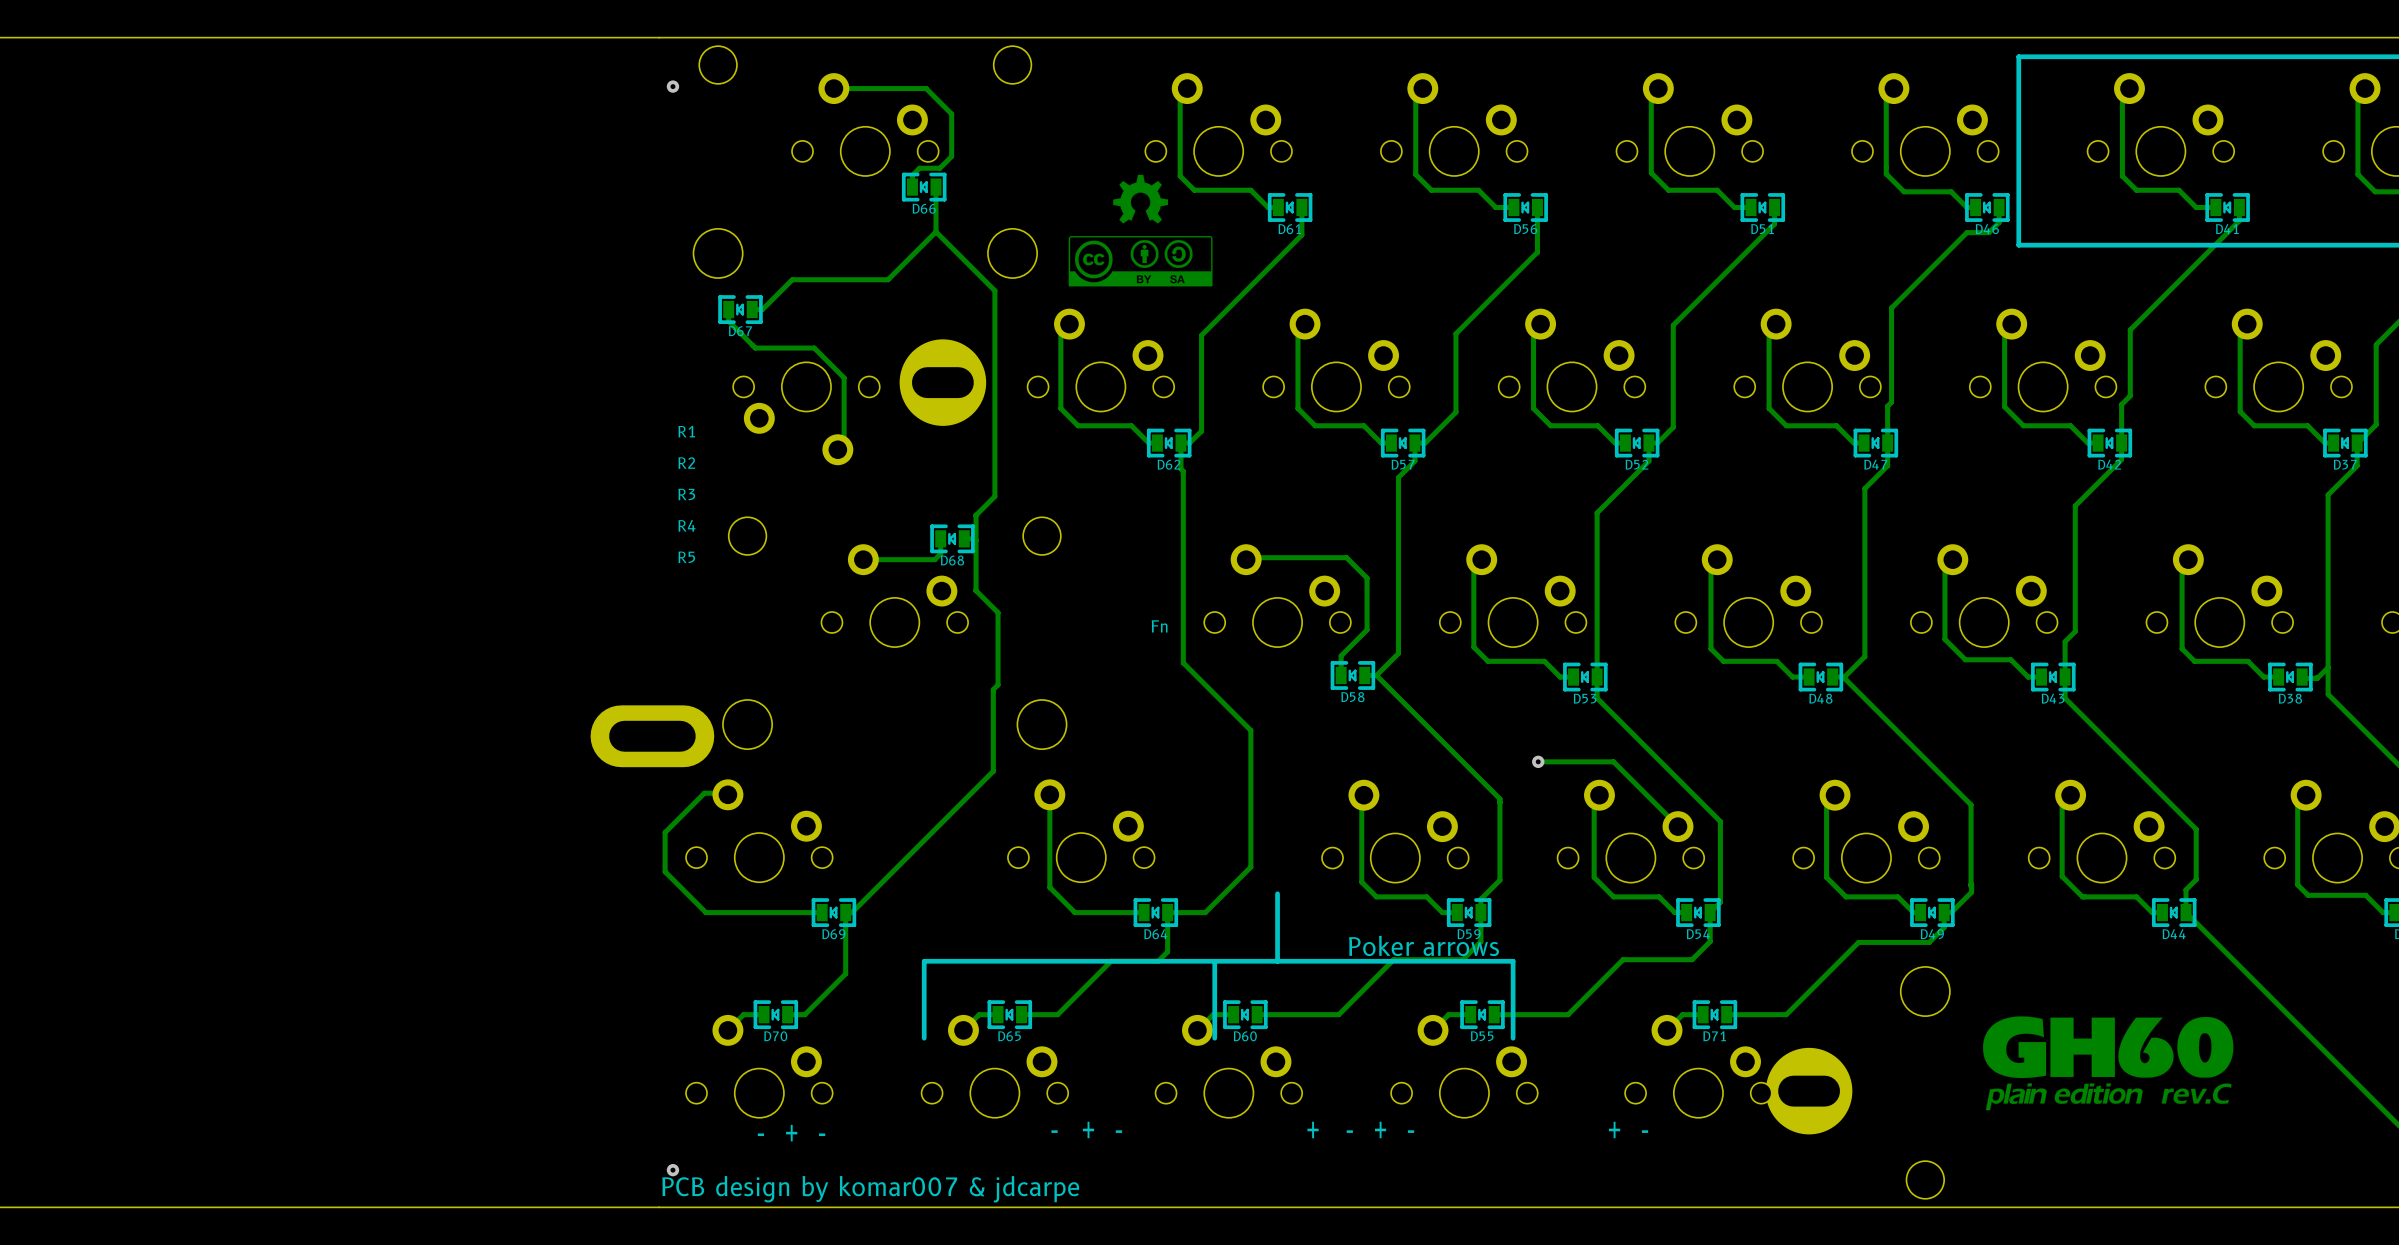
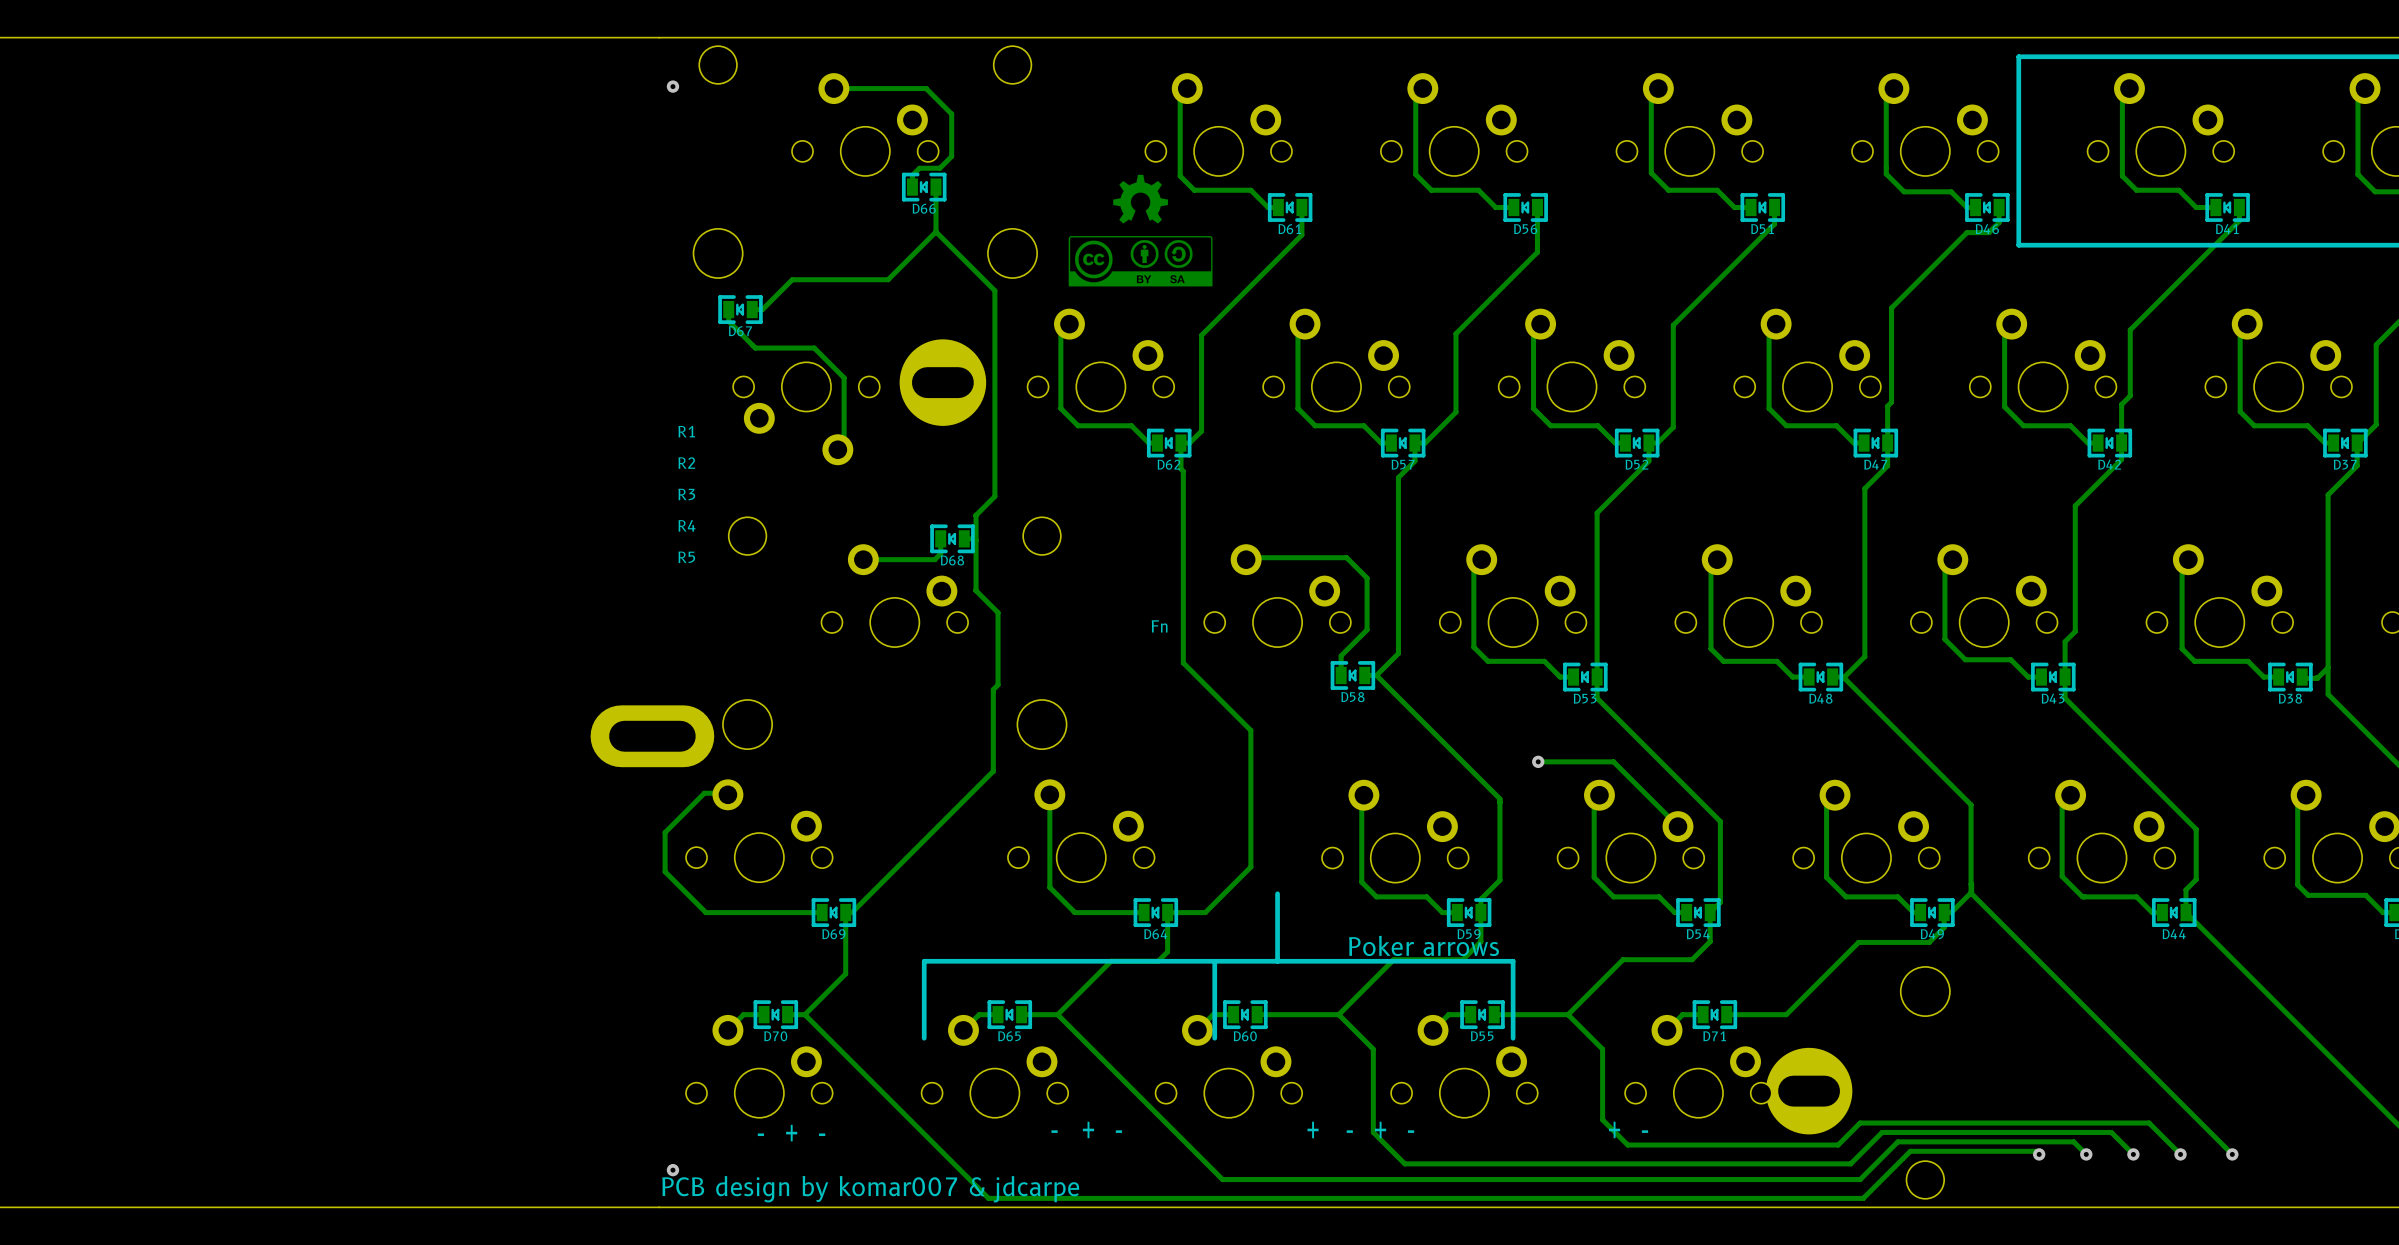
track: none -> (1971, 886) (1971, 893) (2232, 1154)
track: none -> (804, 1014) (988, 1198) (1863, 1198) (1910, 1151) (2036, 1151) (2039, 1154)
track: none -> (1057, 1014) (1222, 1179) (1860, 1179) (1897, 1141) (2073, 1141) (2086, 1154)
track: none -> (1338, 1014) (1373, 1049) (1373, 1132) (1404, 1163) (1850, 1163) (1882, 1132) (2111, 1132) (2133, 1154)
track: none -> (1568, 1014) (1602, 1049) (1602, 1119) (1627, 1145) (1838, 1145) (1860, 1123) (2149, 1123) (2180, 1154)
drawing: [1983, 1016, 2234, 1111] -> none
via: none -> (2039, 1154)
via: none -> (2086, 1154)
via: none -> (2133, 1154)
via: none -> (2180, 1154)
via: none -> (2232, 1154)

